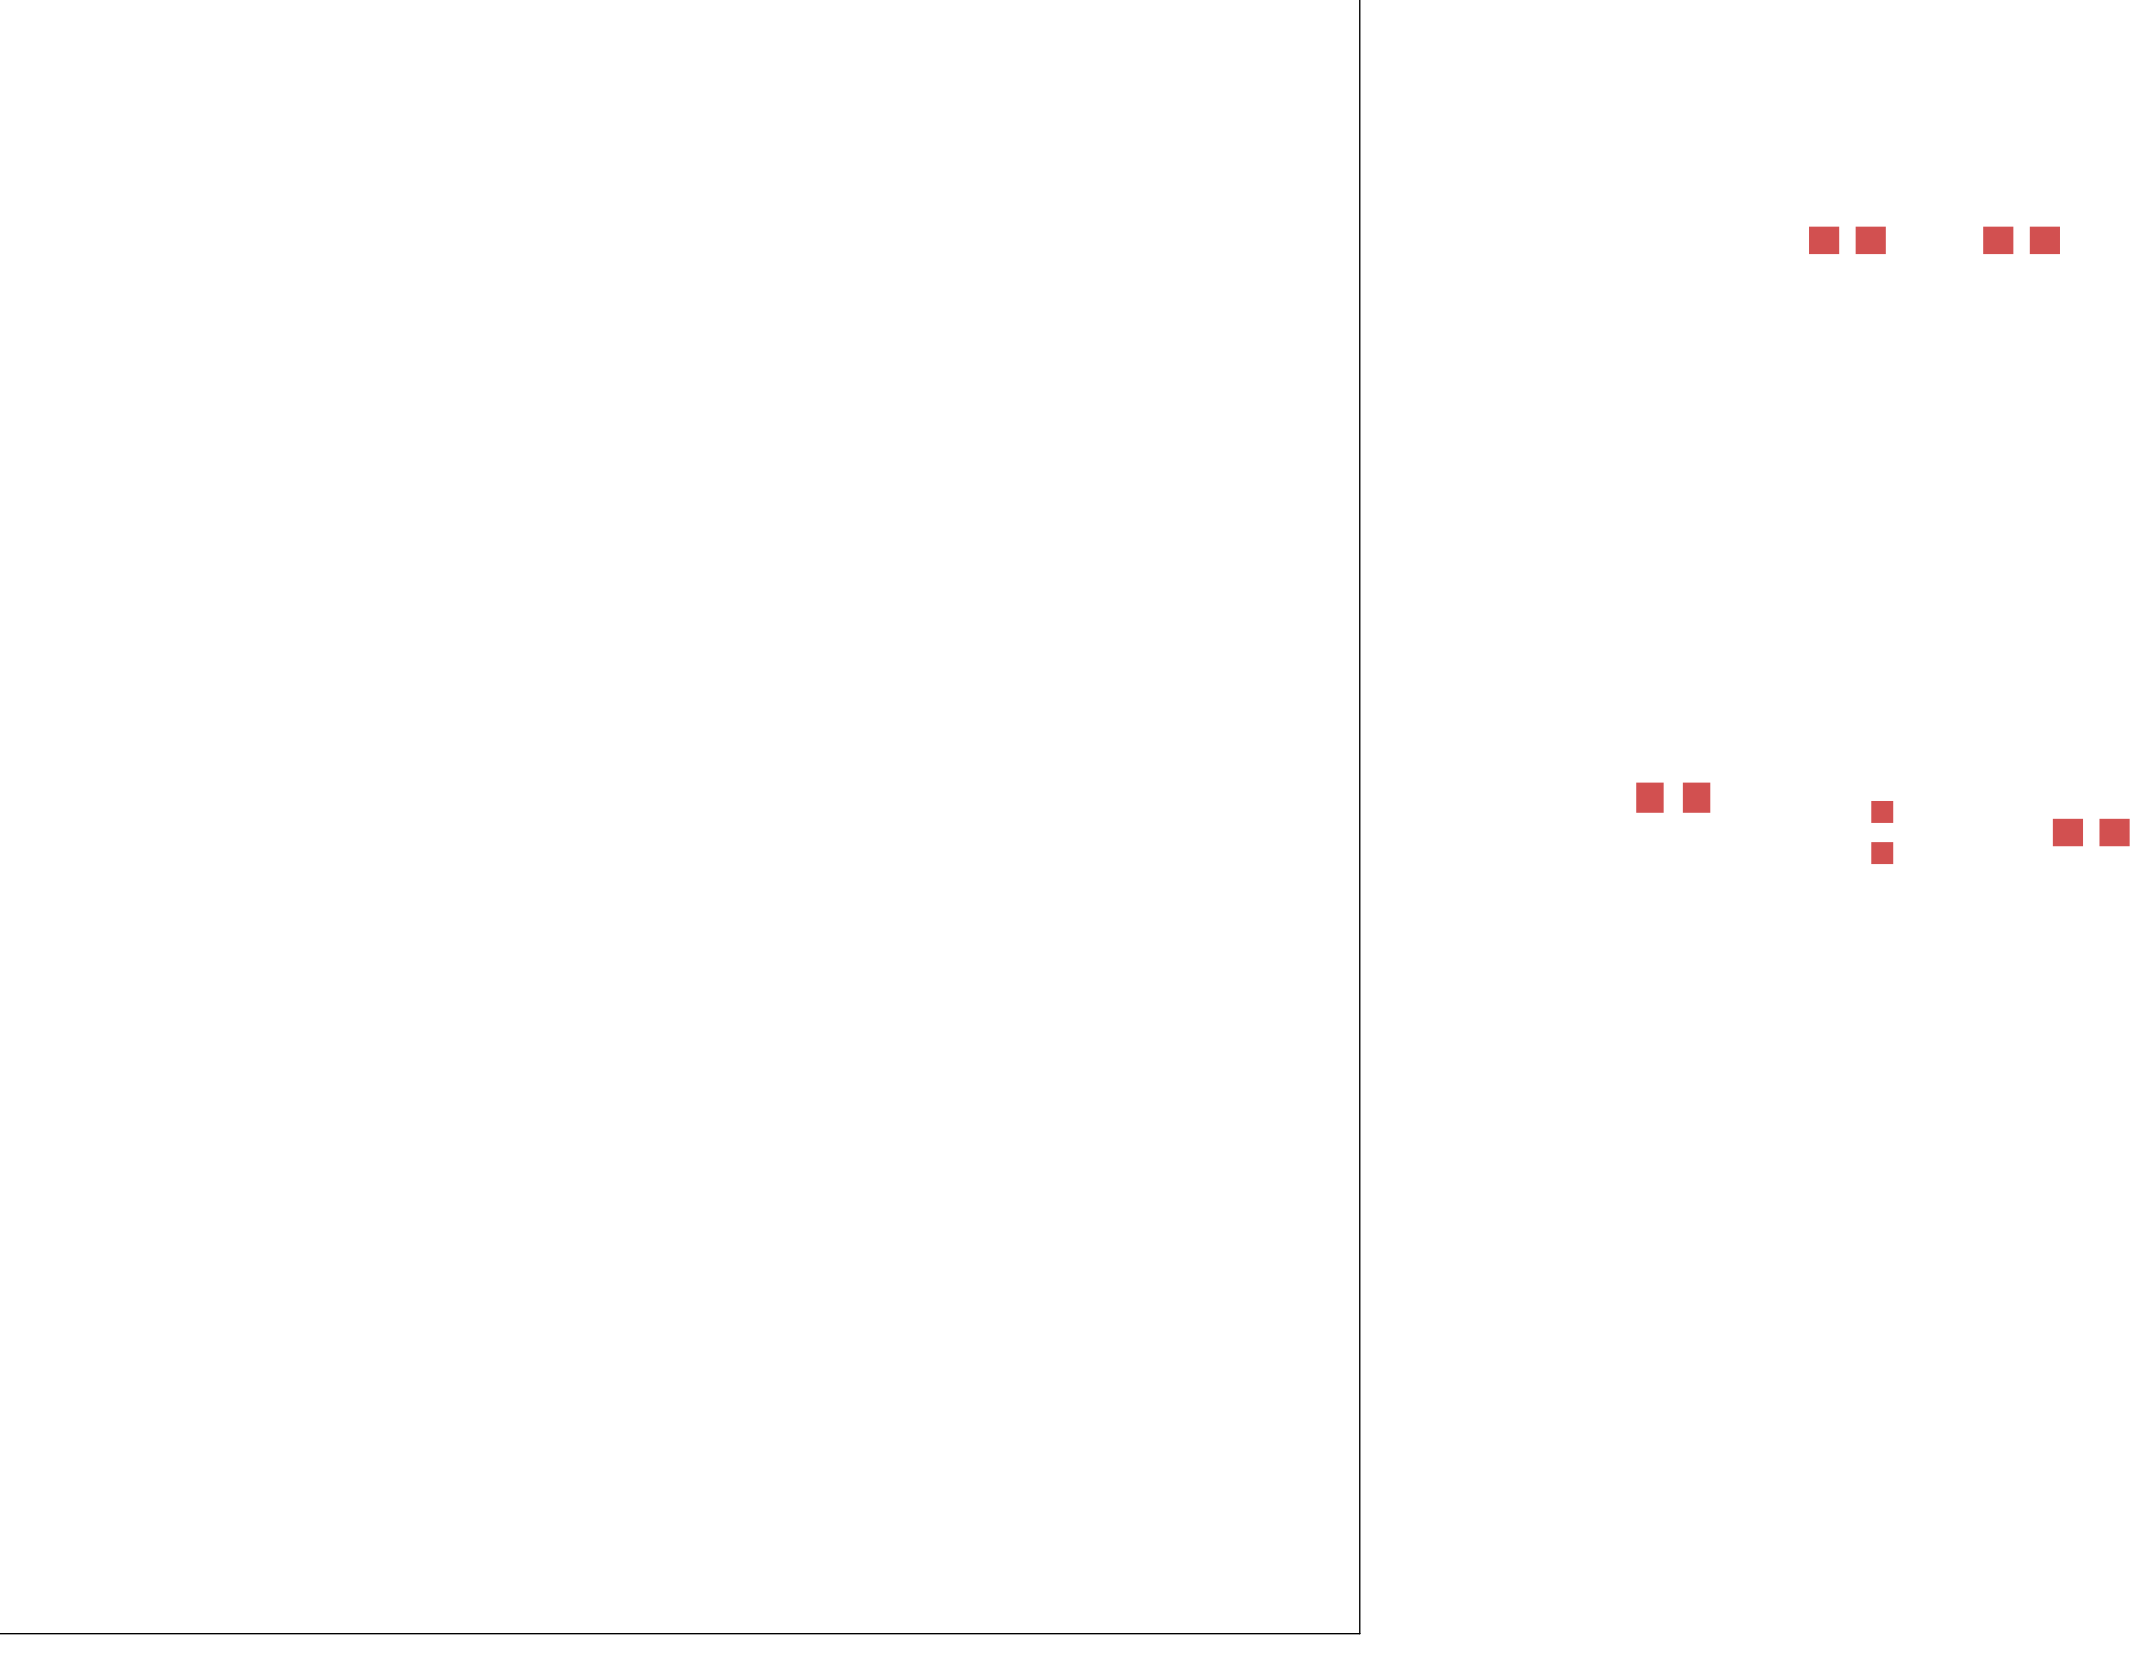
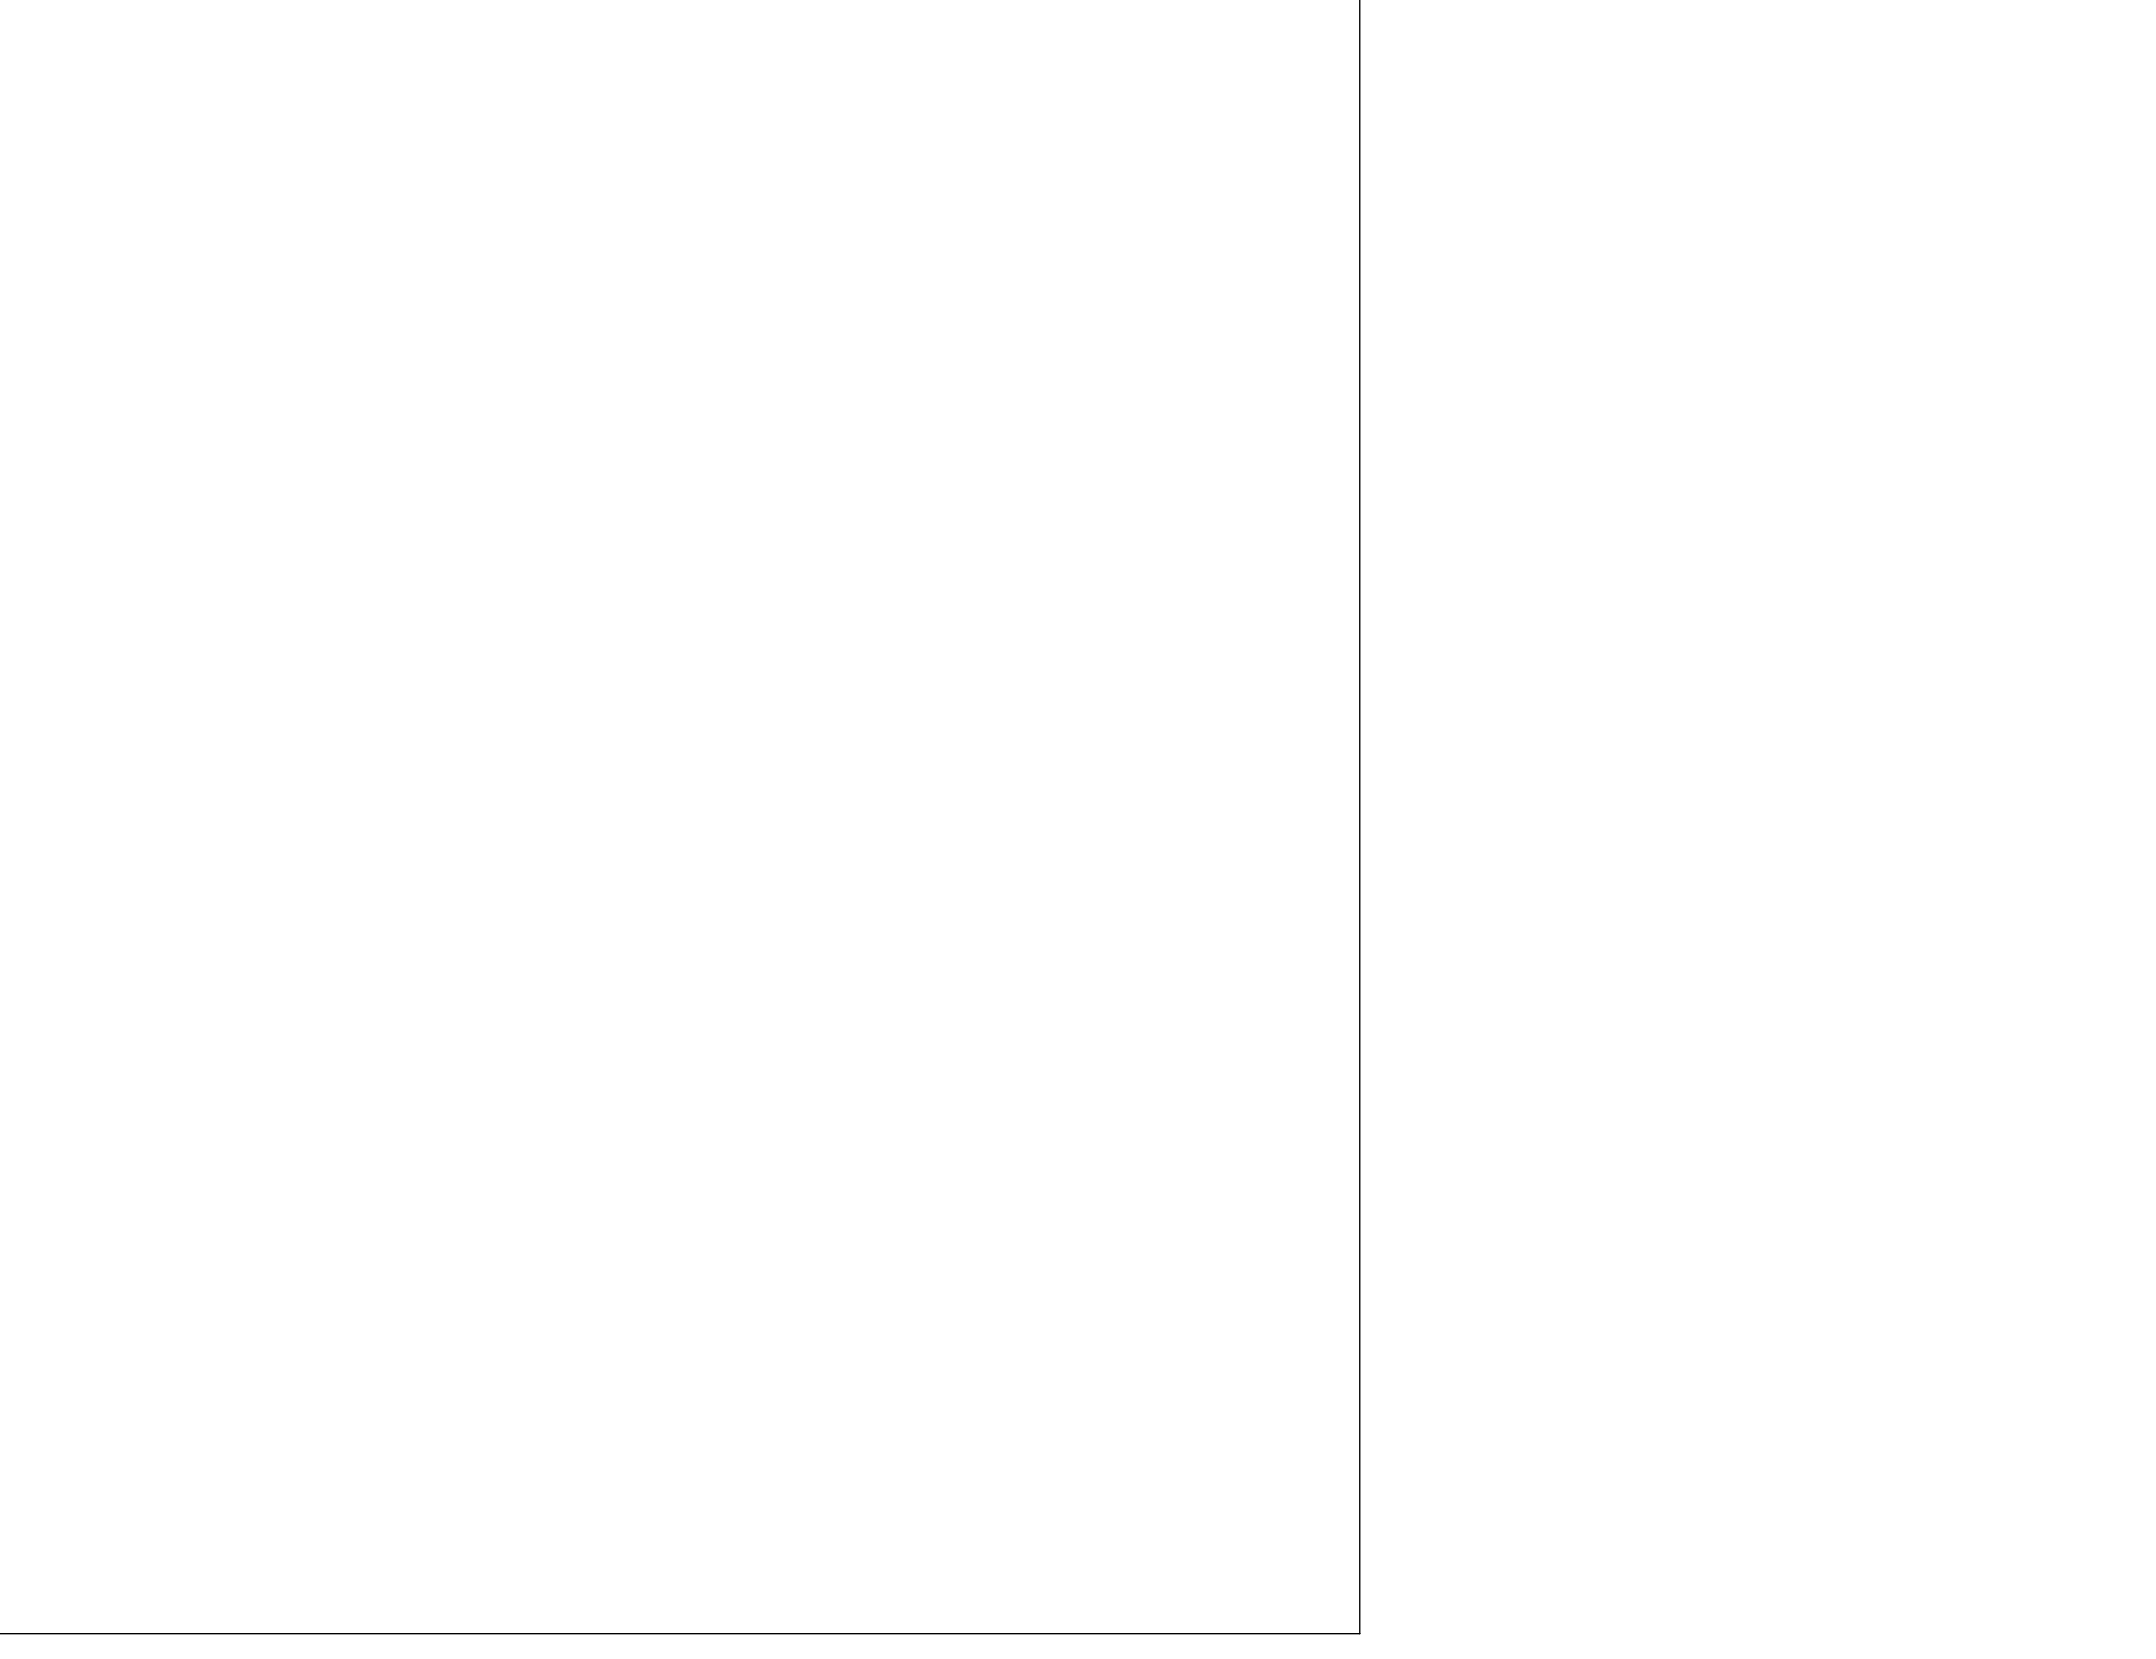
part: (1847, 240) -> none
part: (2021, 240) -> none
part: (1673, 797) -> none
part: (1882, 832) -> none
part: (2091, 832) -> none

